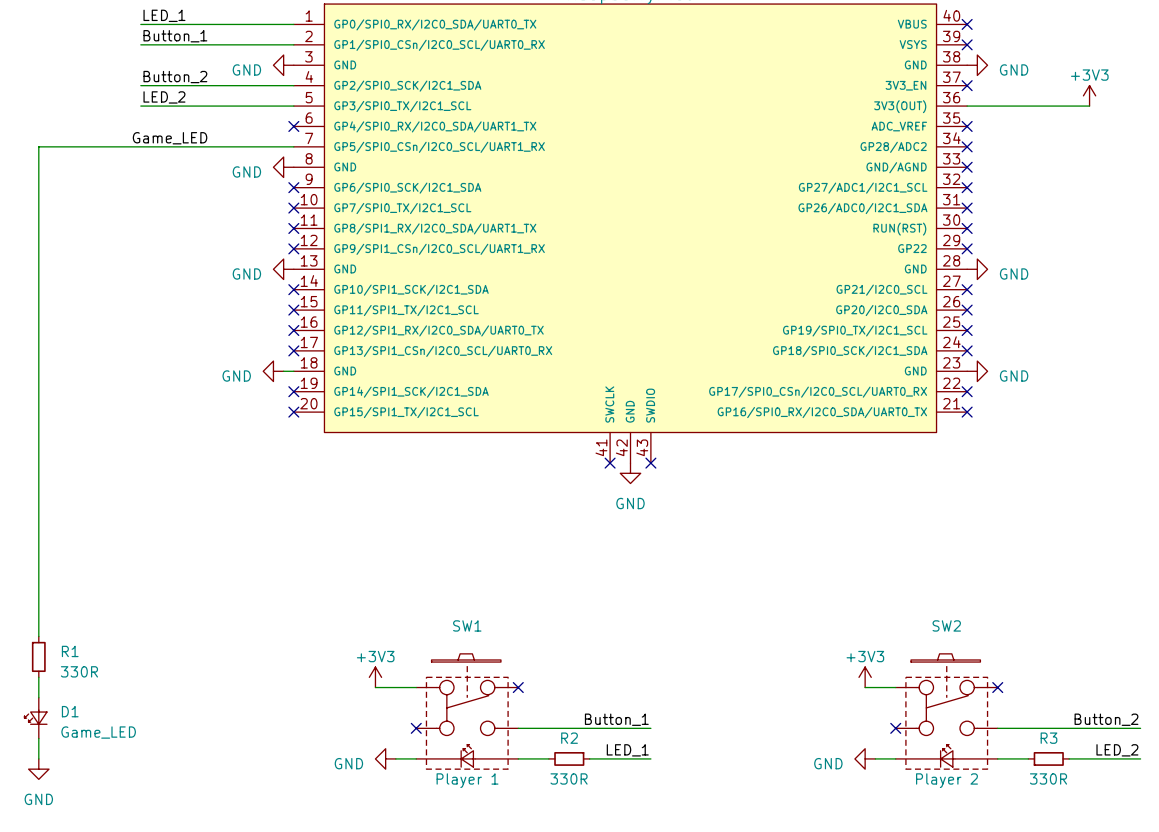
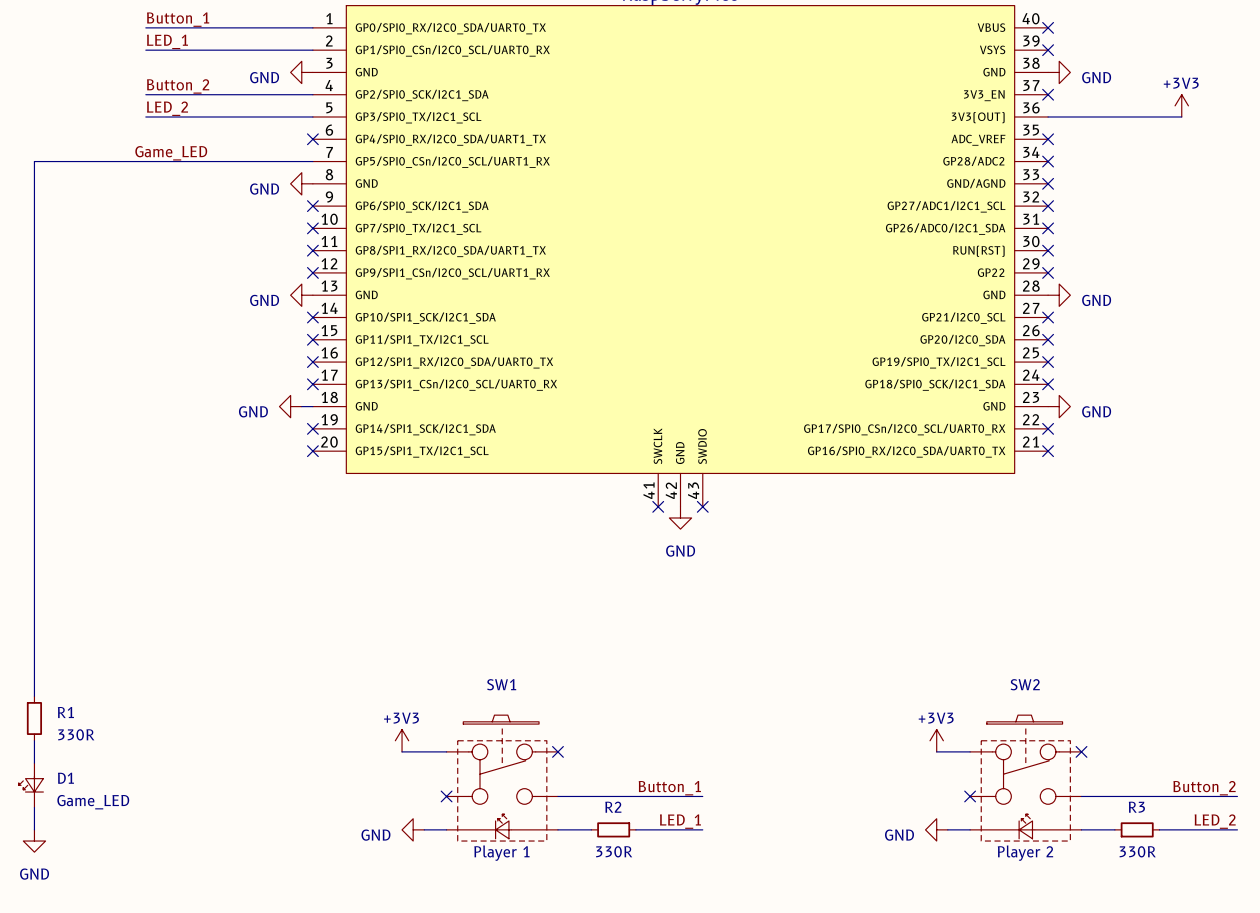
label: LED_1 (164, 15) -> Button_1 (178, 19)
label: Button_1 (175, 36) -> LED_1 (167, 41)

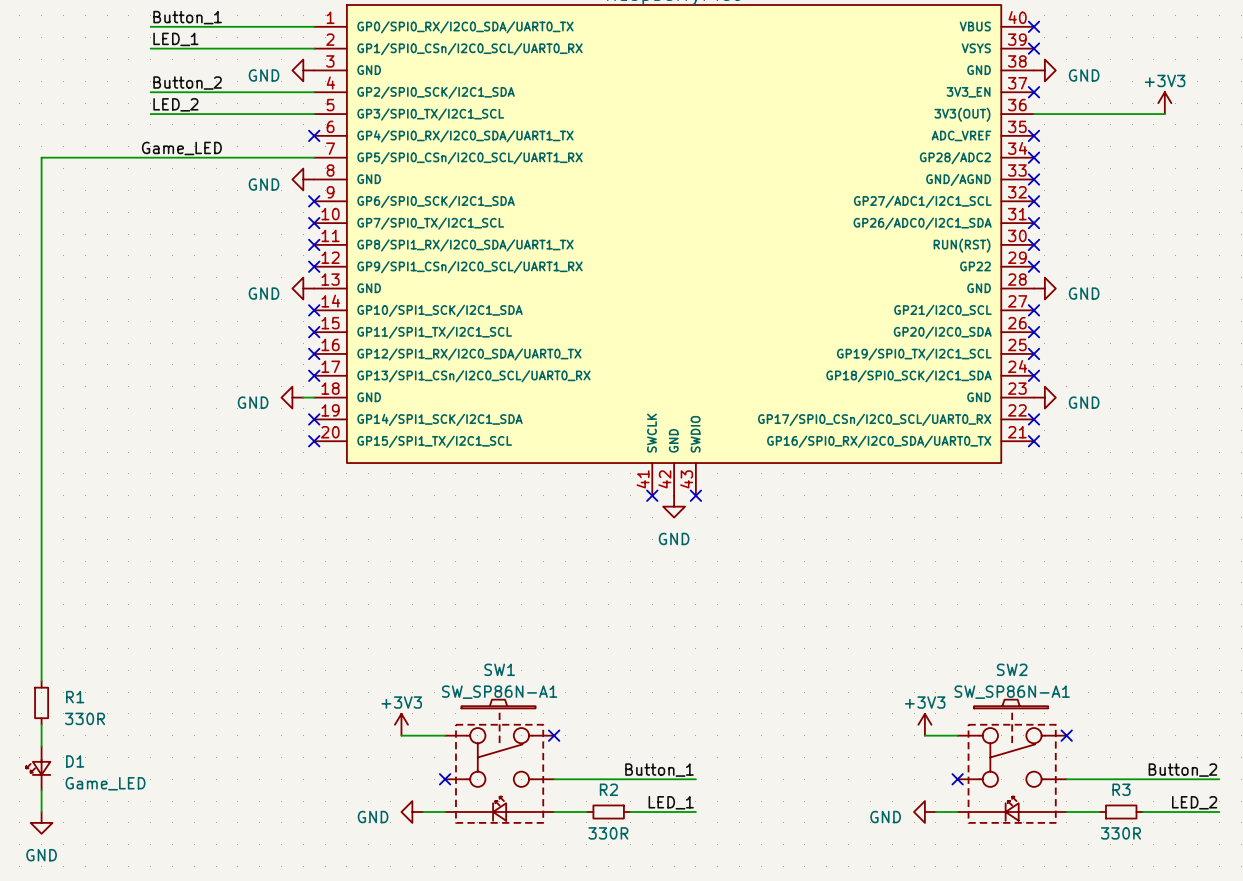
SW1 value: Player 1 (501, 853) -> SW_SP86N-A1 (499, 692)
SW2 value: Player 2 (1025, 853) -> SW_SP86N-A1 (1012, 692)

